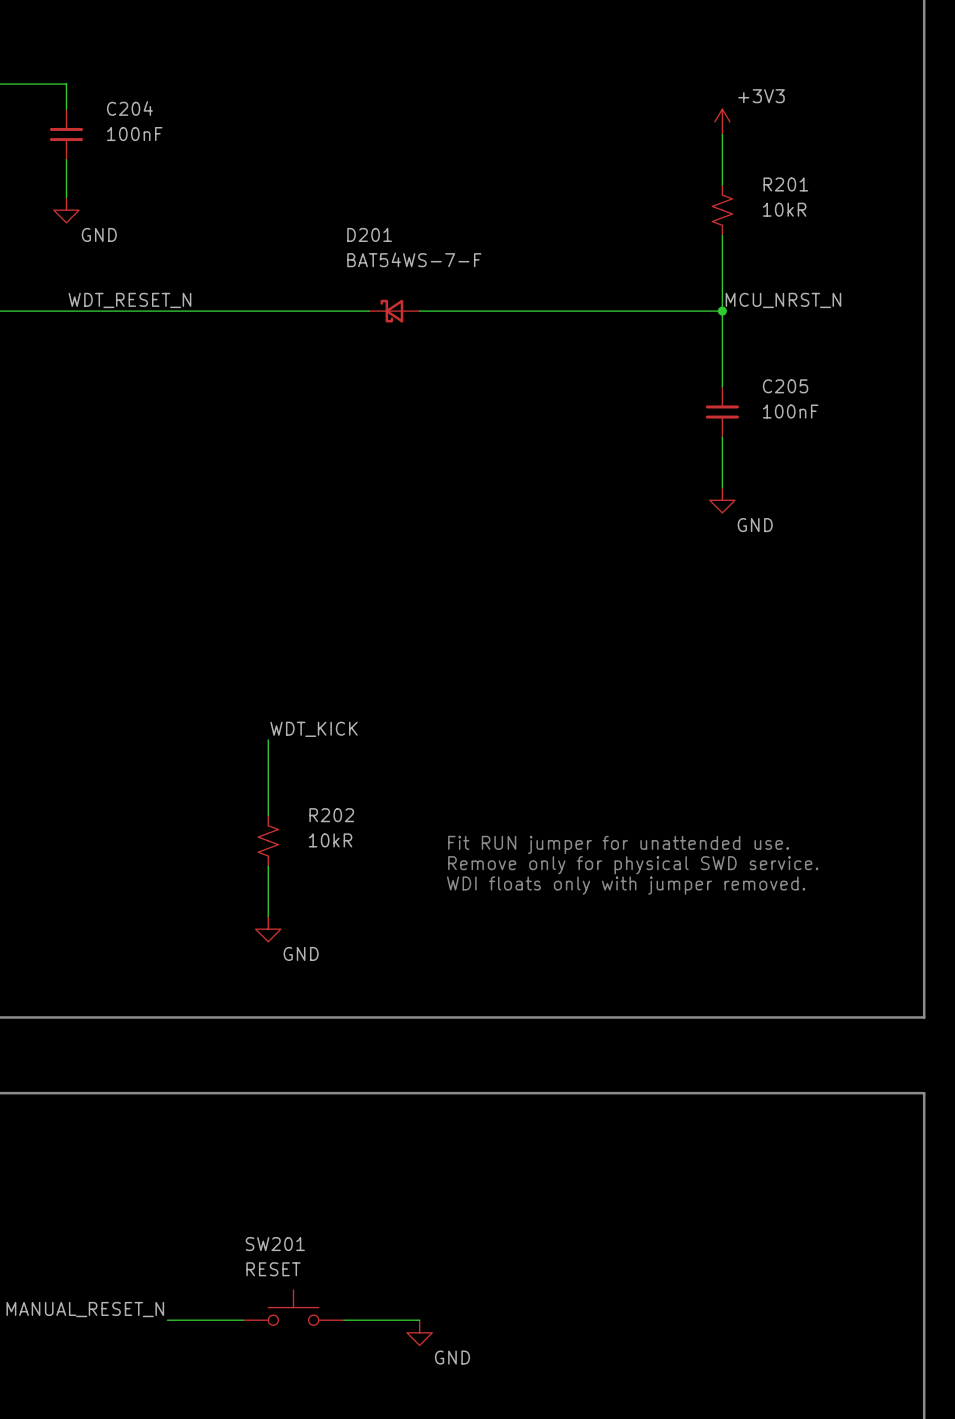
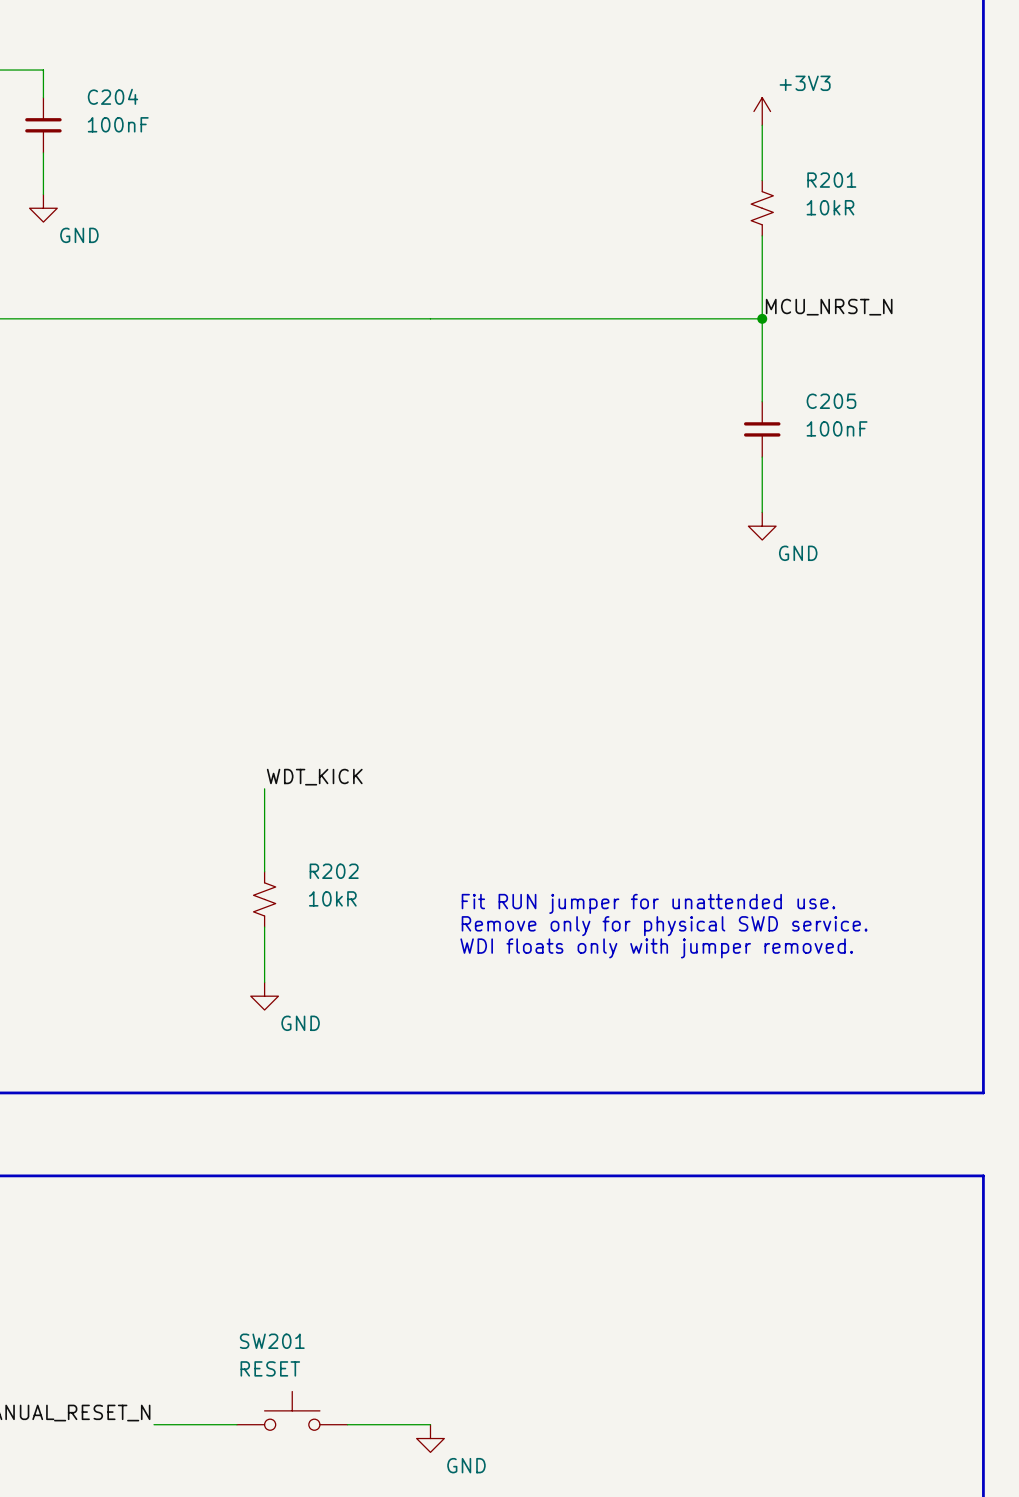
label: WDT_RESET_N (129, 300) -> none
D201: BAT54WS-7-F (394, 311) -> none

